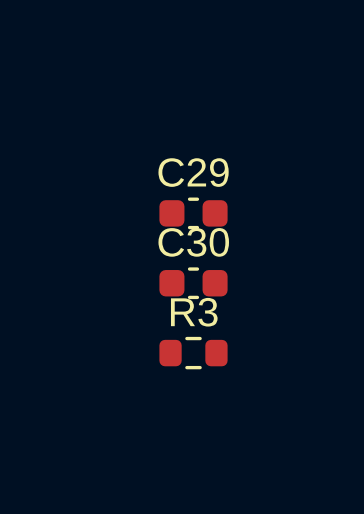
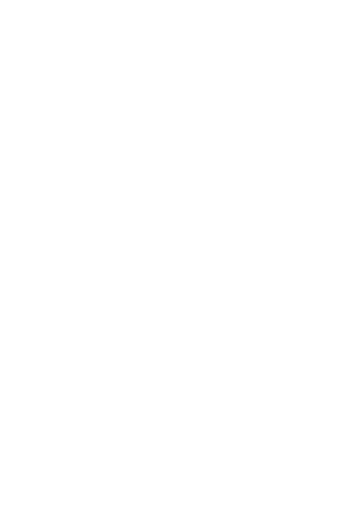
C29: (193, 213) -> none
C30: (193, 283) -> none
R3: (193, 353) -> none

